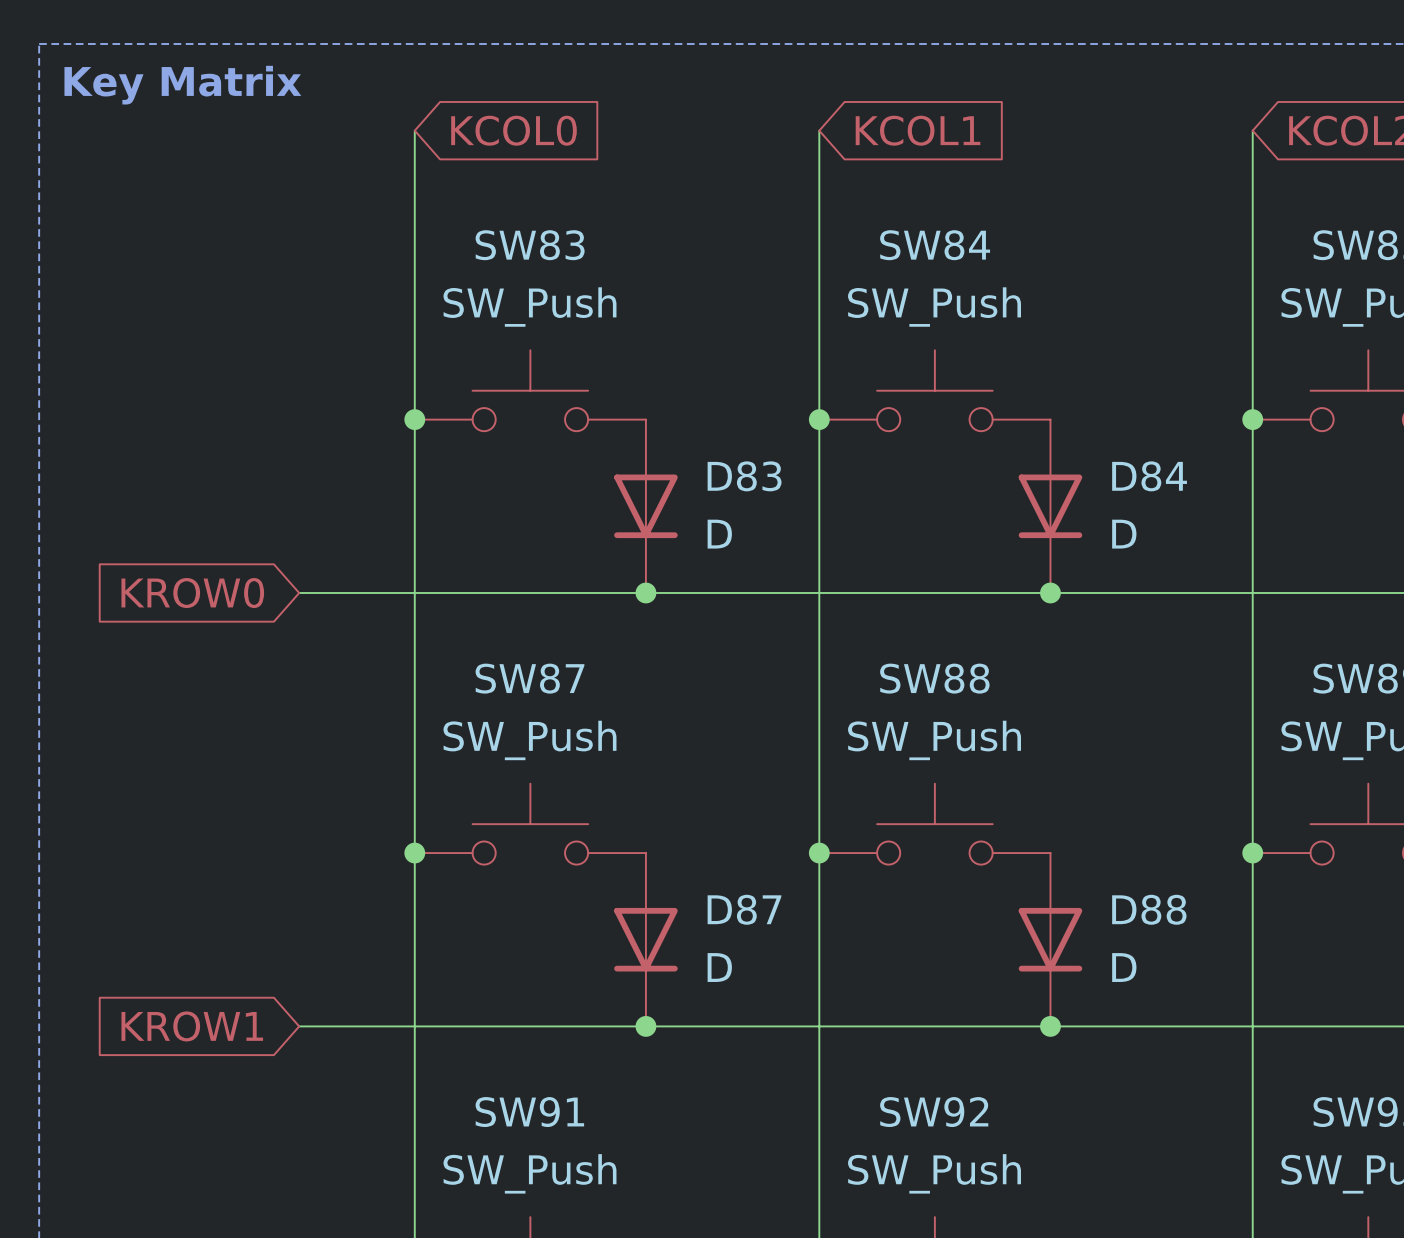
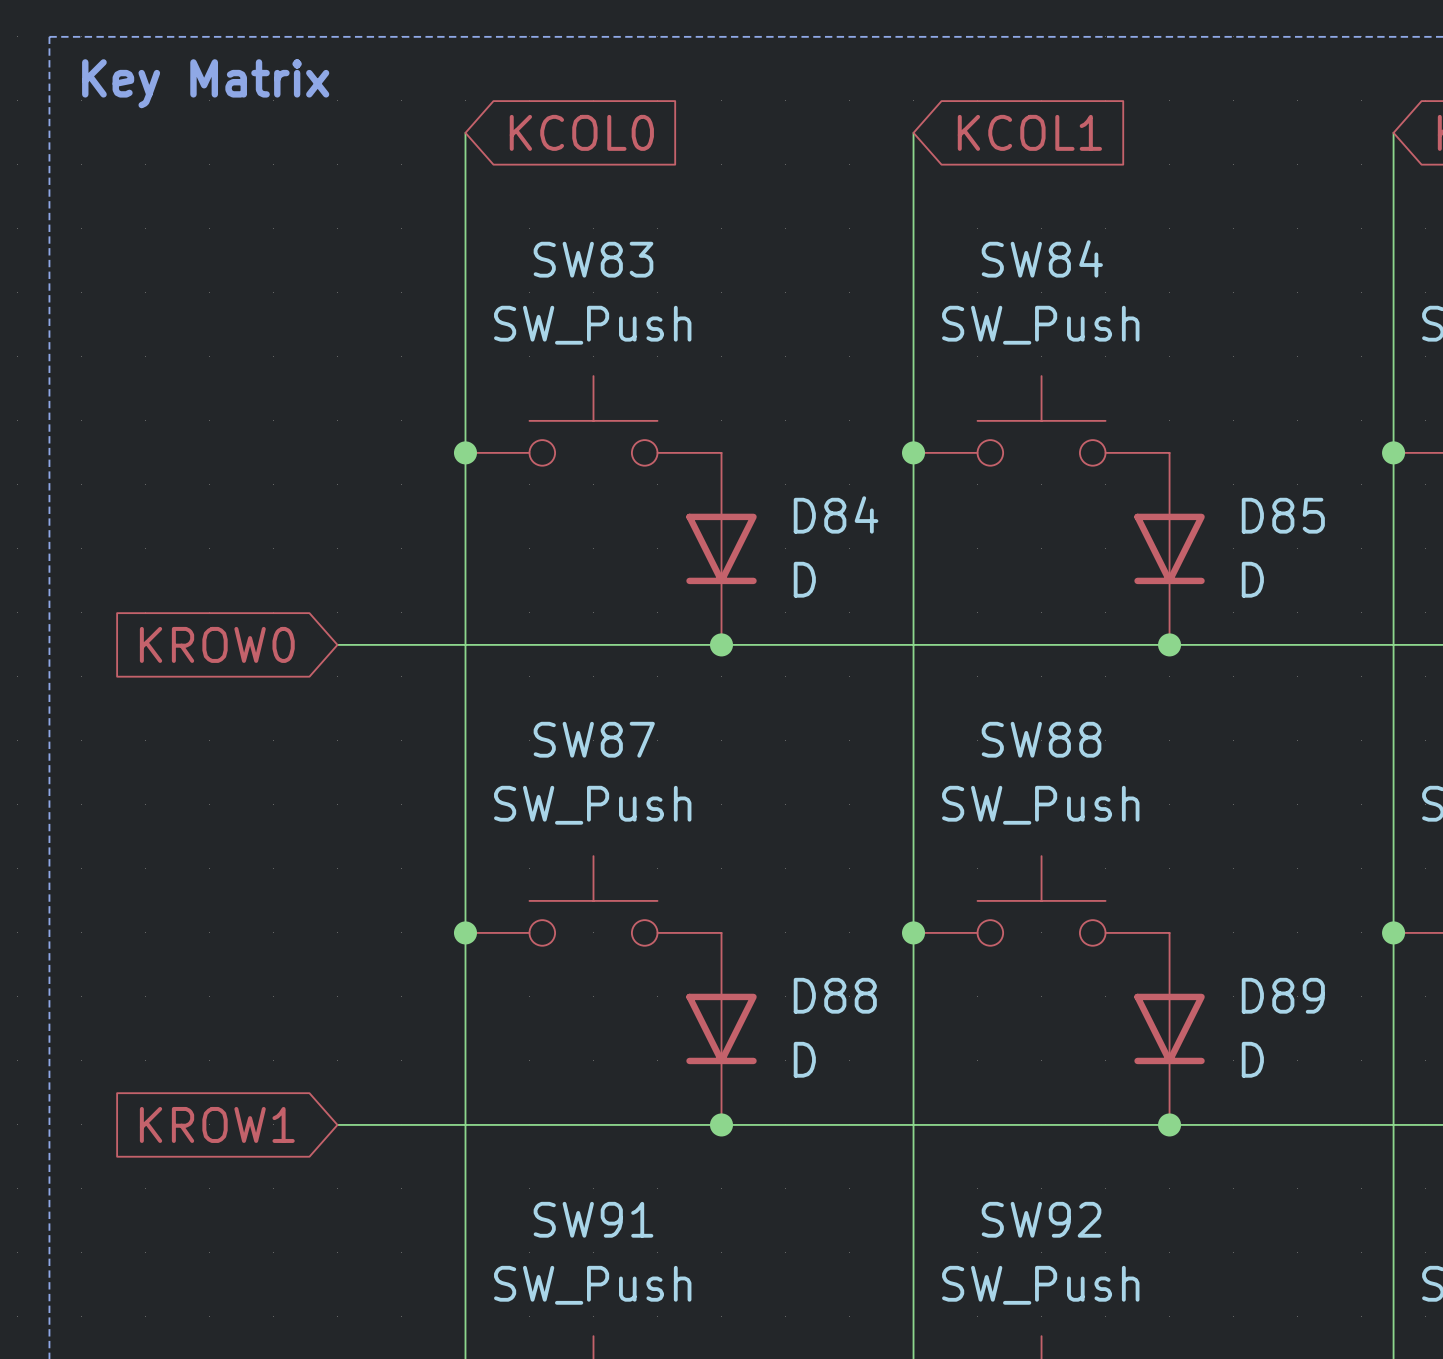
D83 name: D83 (744, 476) -> D84 (836, 514)
D84 name: D84 (1149, 476) -> D85 (1283, 515)
D87 name: D87 (744, 909) -> D88 (835, 995)
D88 name: D88 (1149, 909) -> D89 (1283, 995)

